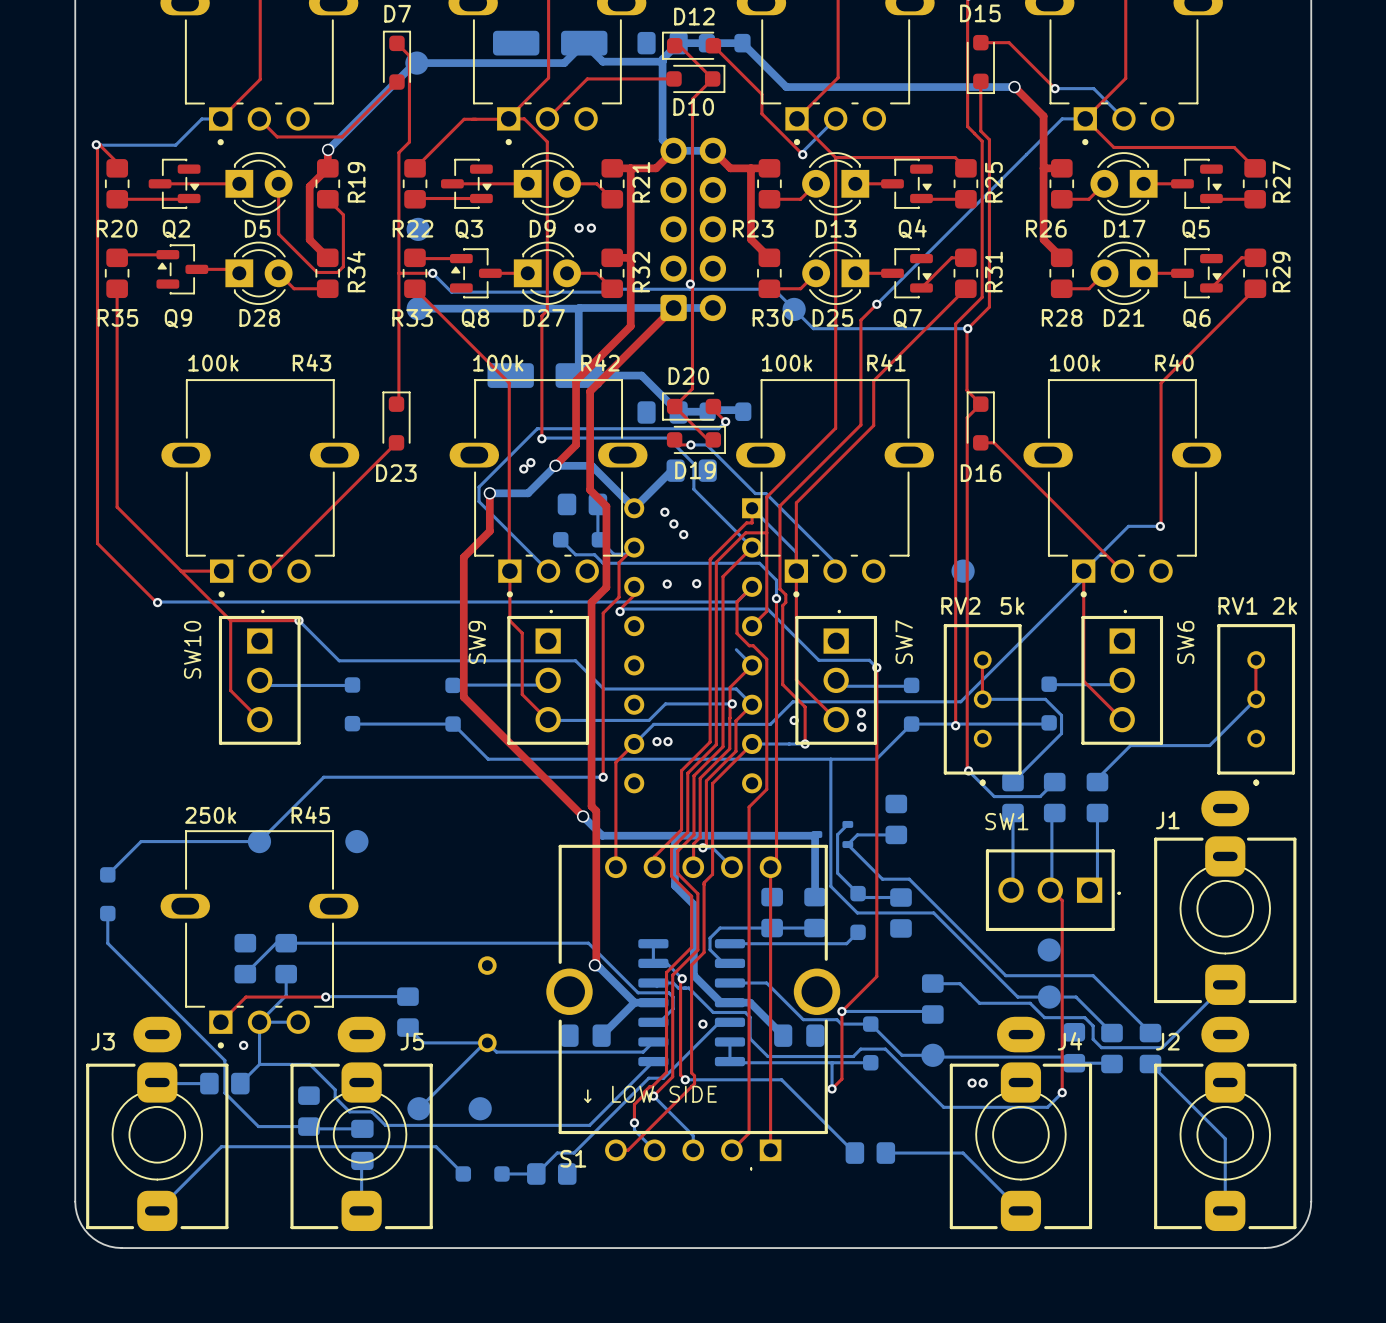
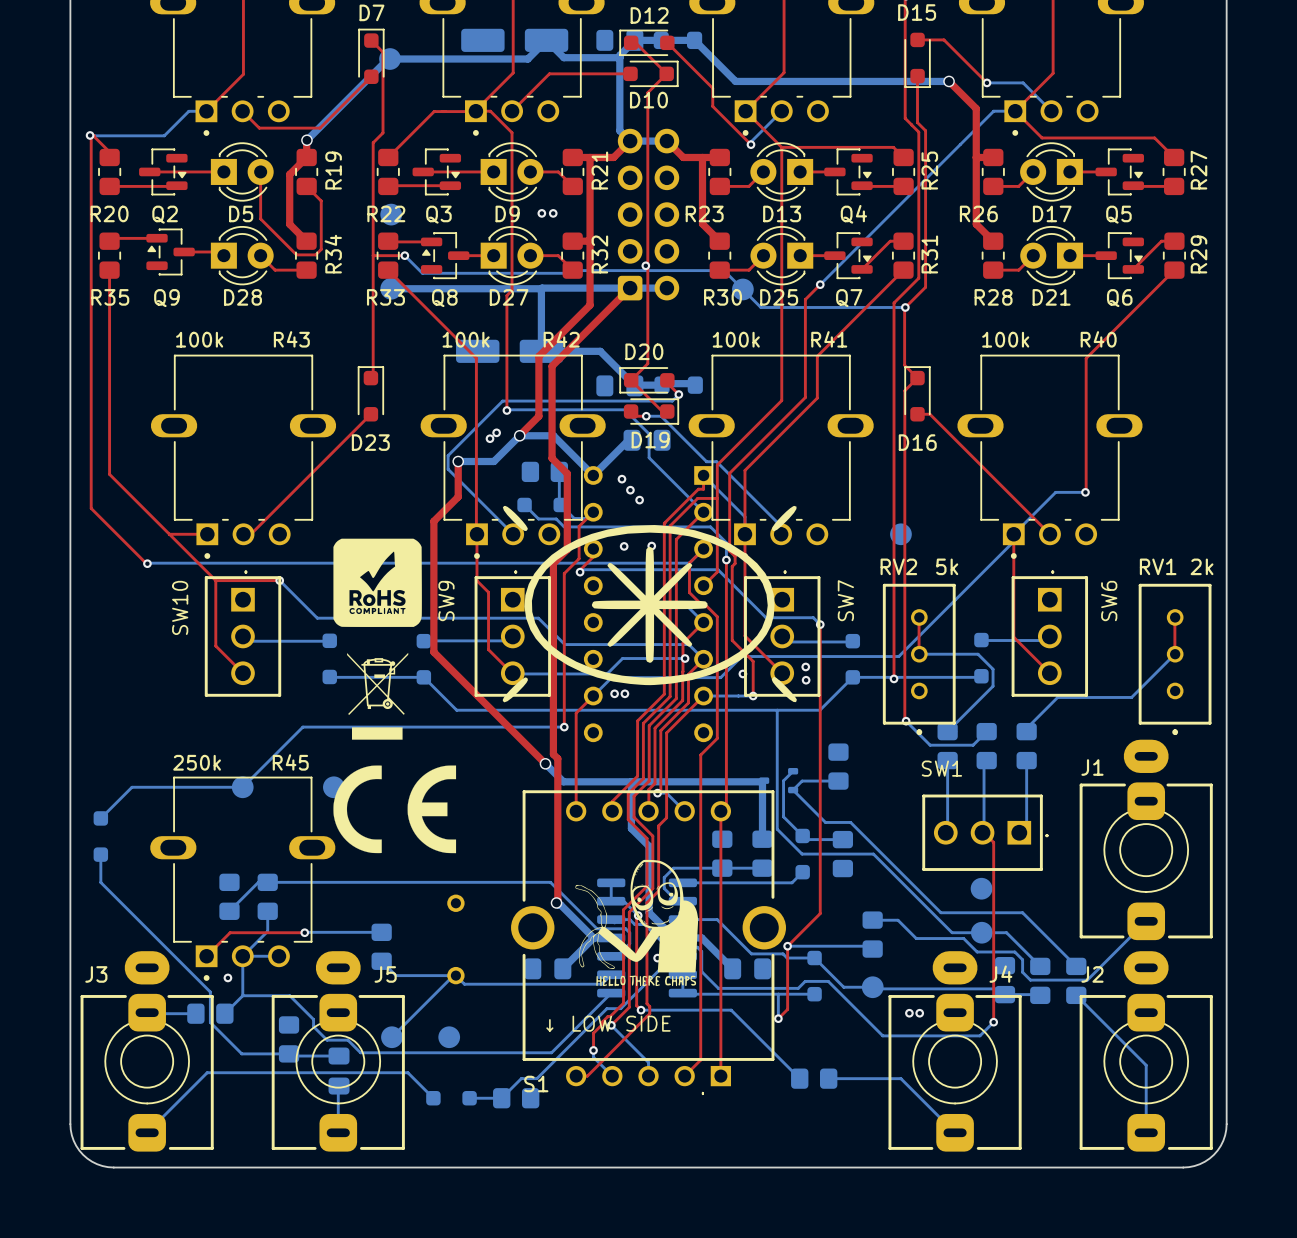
drawing: none -> [502, 505, 797, 703]
drawing: none -> [333, 538, 422, 627]
drawing: none -> [347, 652, 409, 740]
drawing: none -> [333, 765, 457, 854]
drawing: none -> [575, 859, 699, 987]

